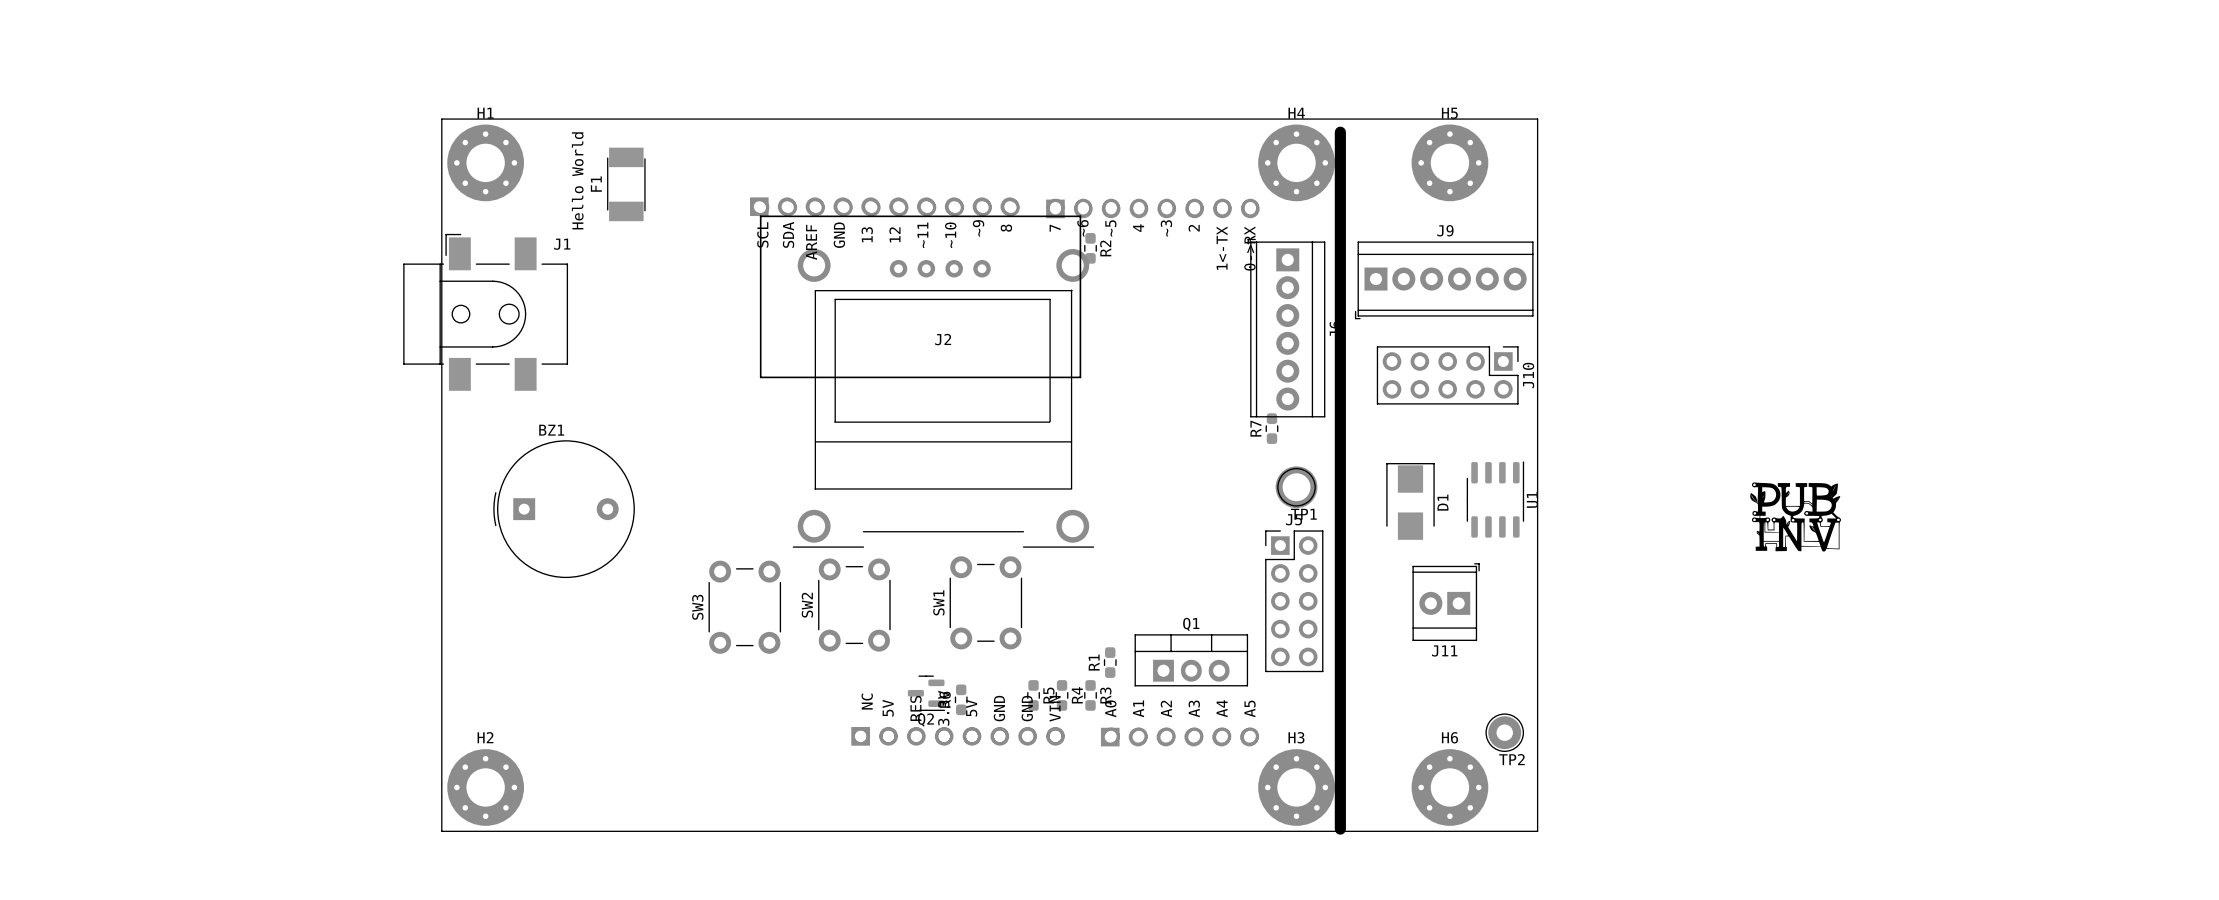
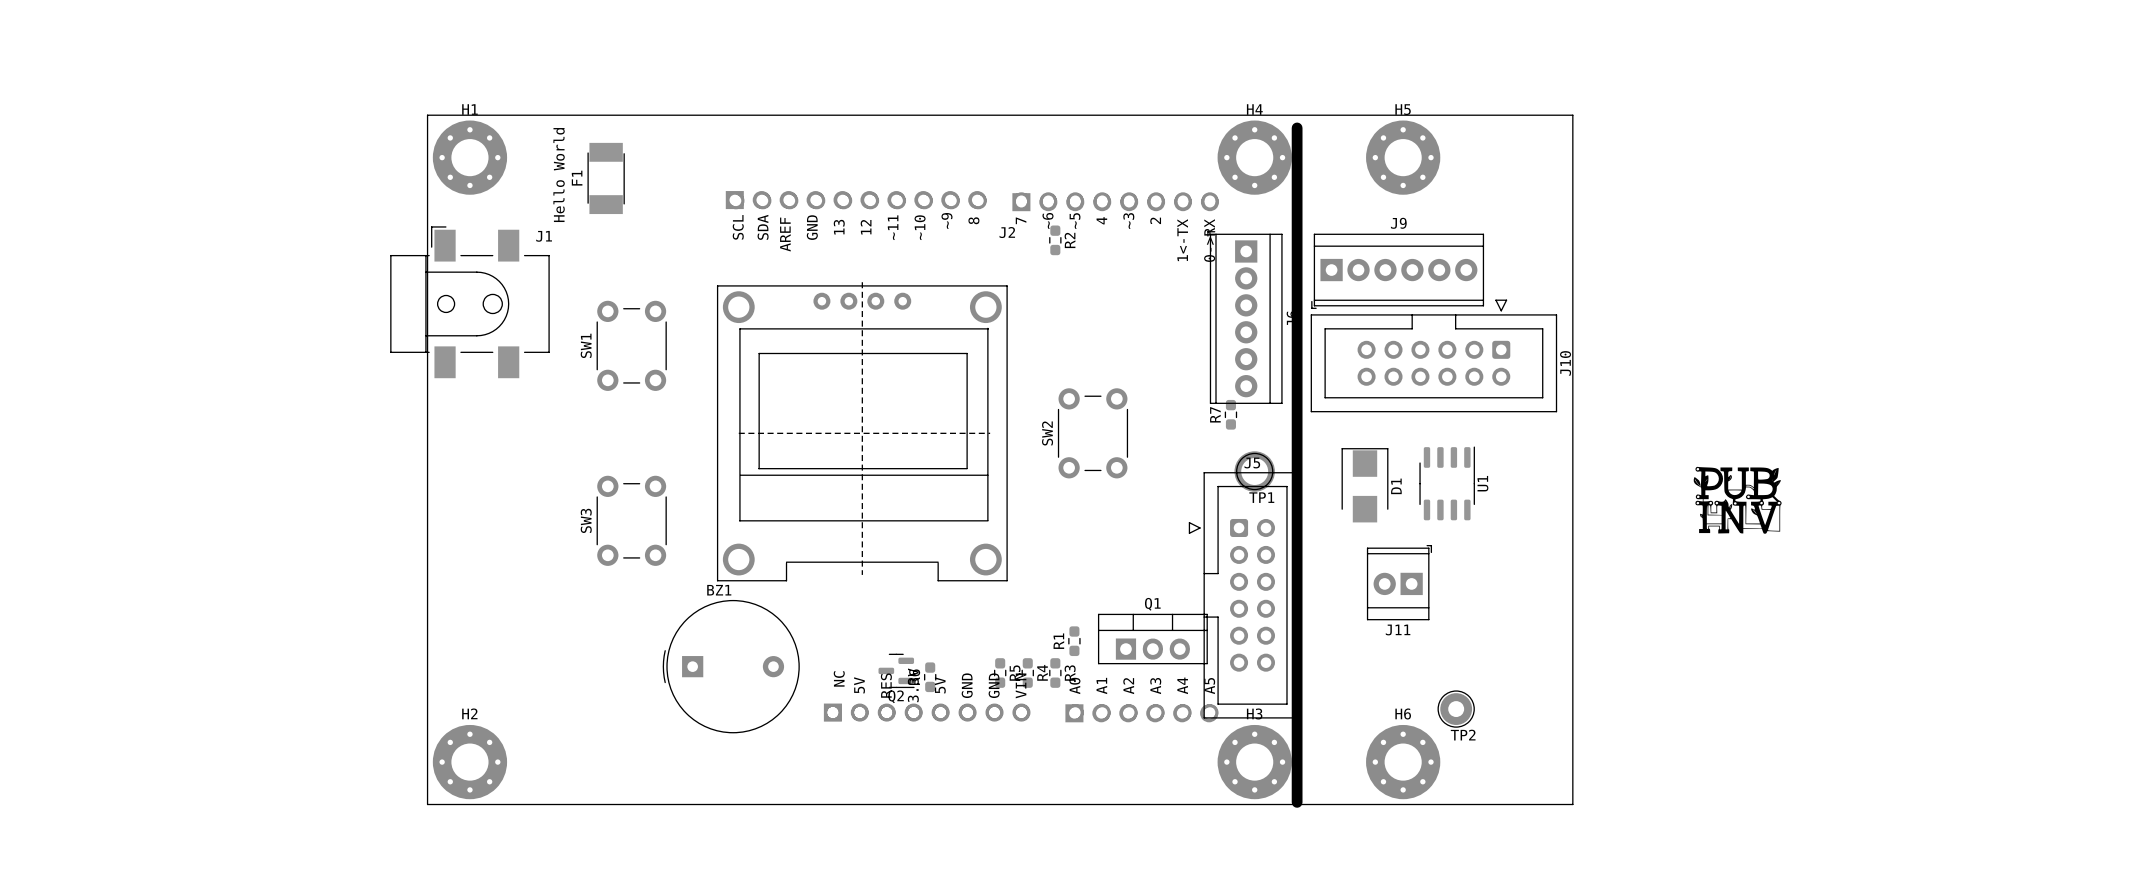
board edge: (1537, 119) (1537, 831) -> (1488, 115) (1572, 115) (1572, 804) (1488, 804)
line: (760, 216) (1080, 216) (1080, 377) (760, 377) (760, 216) -> none
J2 footprint: [792, 249, 1095, 548] -> [717, 281, 1008, 582]
J2 name position: J2 (943, 339) -> J2 (1007, 232)
J10 footprint: [1376, 346, 1519, 405] -> [1310, 299, 1558, 413]
J10 name position: J10 (1528, 375) -> J10 (1565, 363)
BZ1 position: (564, 509) -> (731, 666)
J5 name position: J5 (1294, 519) -> J5 (1252, 463)
J5 footprint: [1265, 530, 1324, 673] -> [1188, 472, 1302, 719]
SW1 position: (985, 602) -> (631, 345)
SW2 position: (854, 605) -> (1092, 433)
SW3 position: (744, 607) -> (631, 520)

